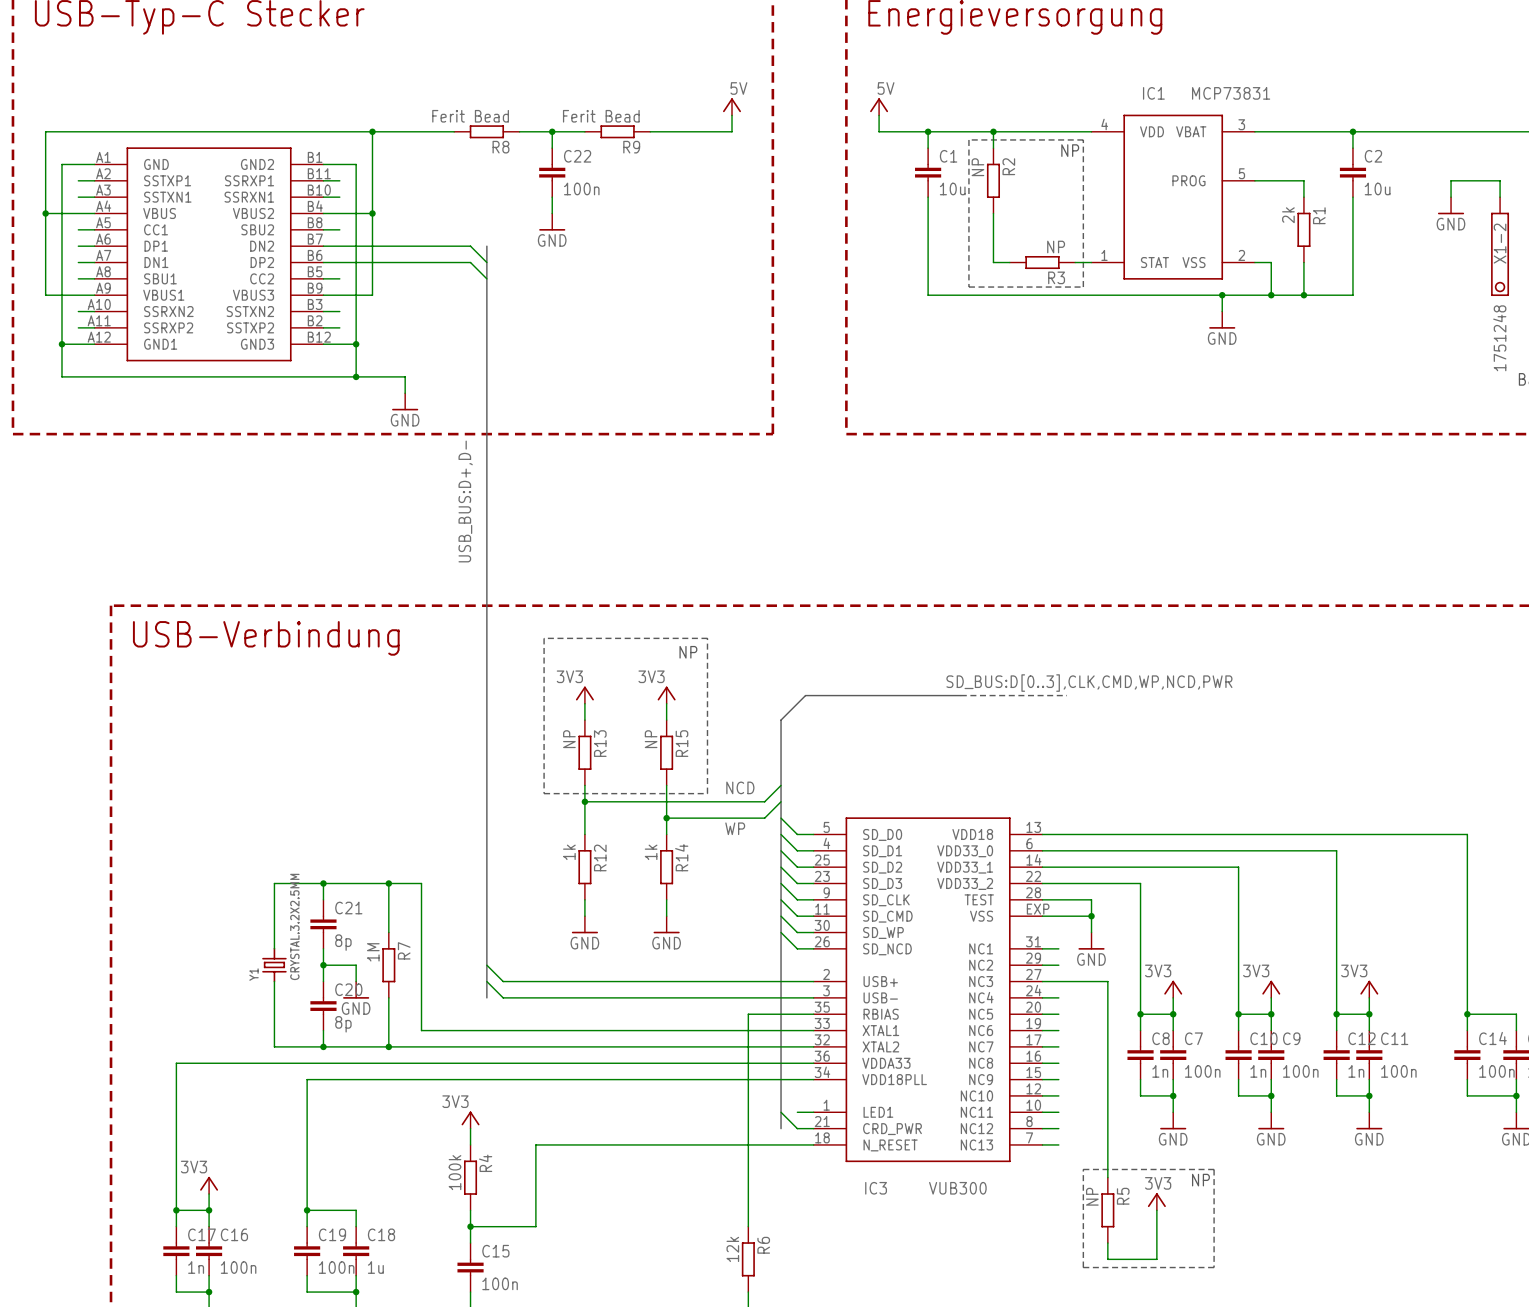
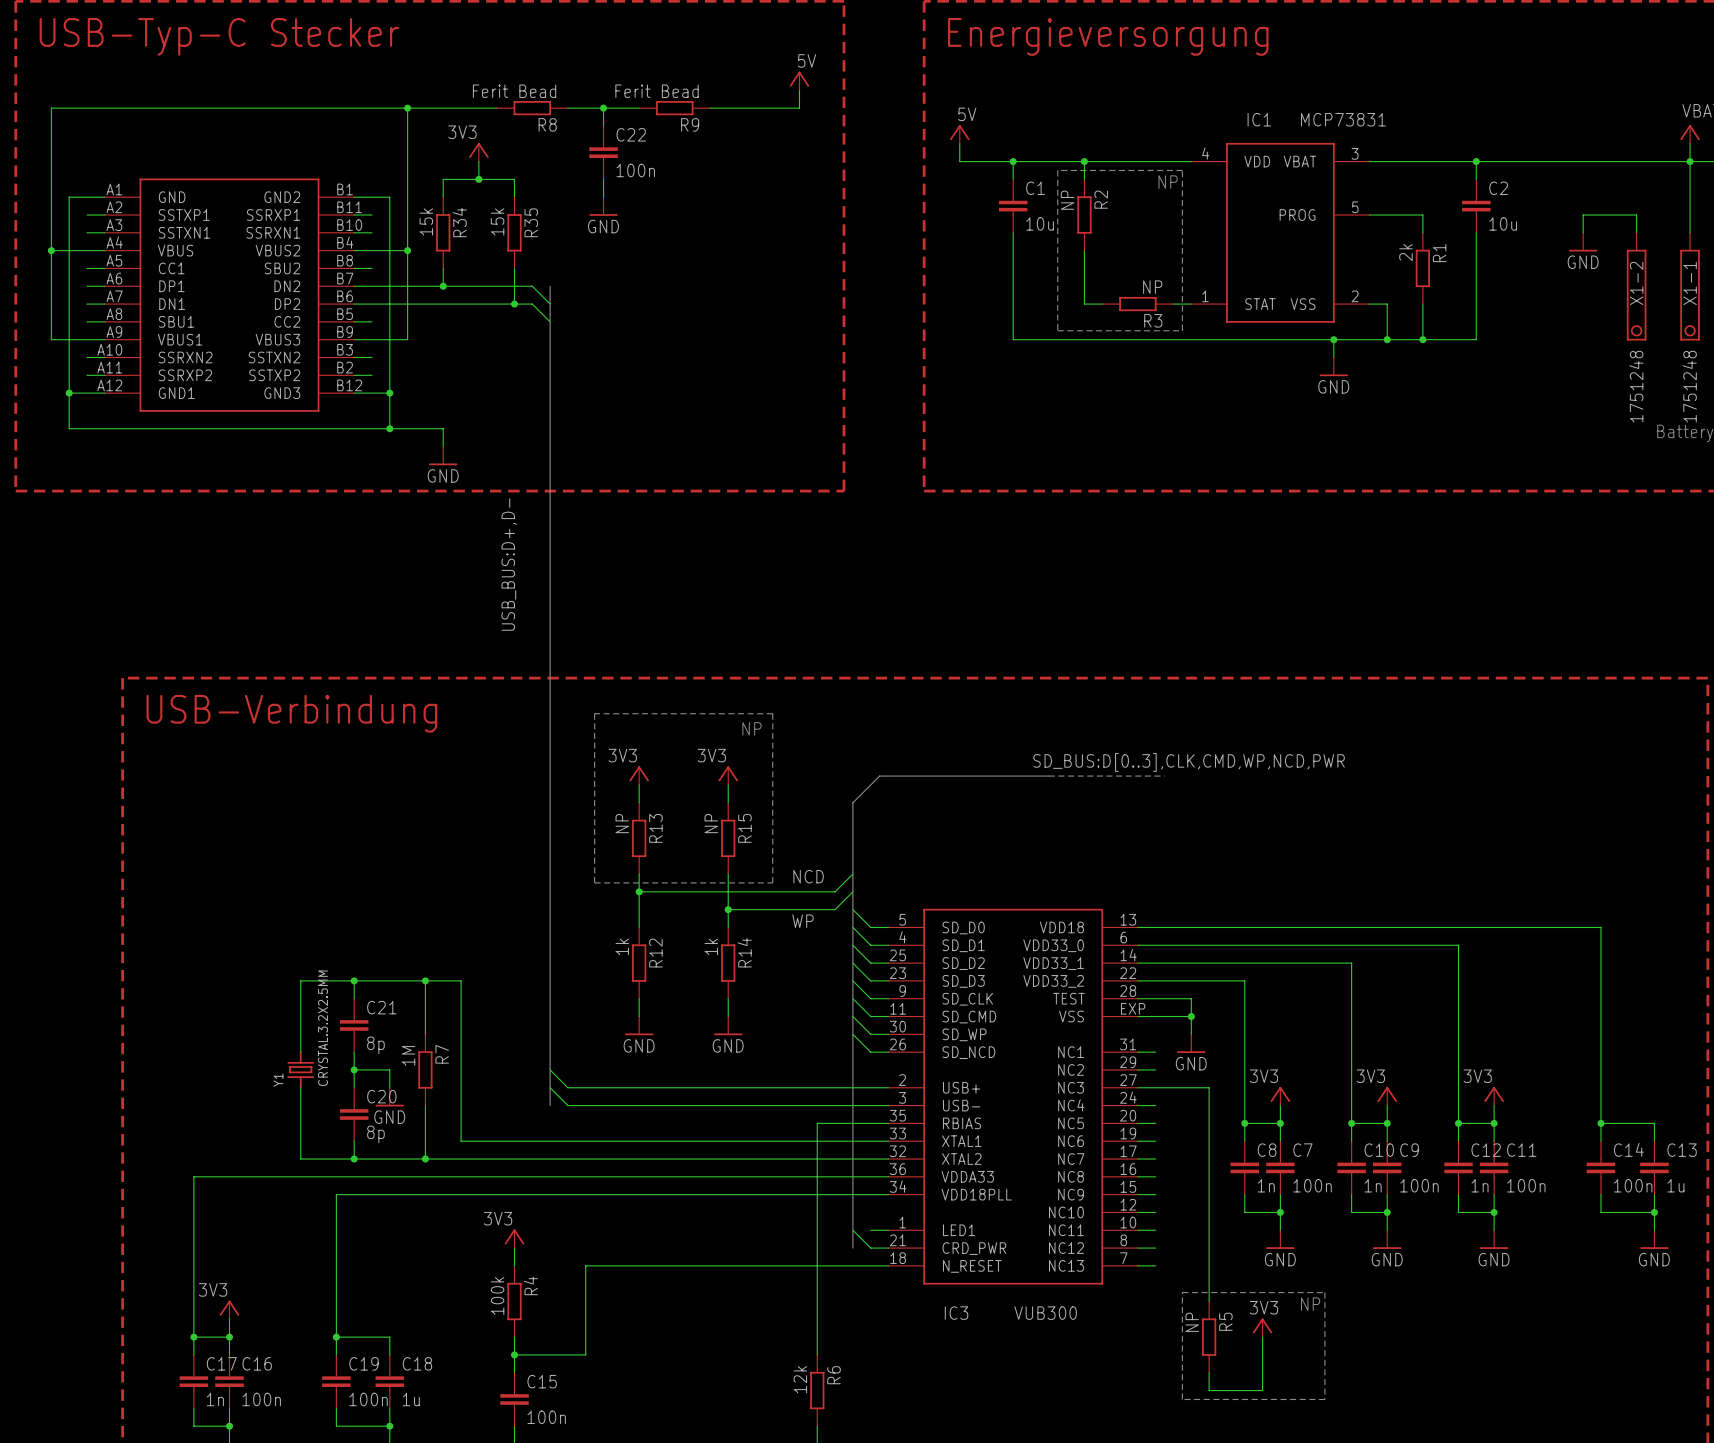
wire: none -> (407, 108) (407, 161)
junction: none -> (407, 108)
junction: none -> (603, 108)
power symbol position: 5V (732, 106) -> 5V (799, 80)
wire: (732, 115) (732, 131) (650, 131) -> (799, 90) (799, 108) (710, 108)
power symbol: none -> 3V3 (478, 152)
wire: (45, 131) (454, 131) -> (51, 161) (51, 108) (496, 108)
junction: (372, 131) -> none
wire: none -> (478, 161) (478, 179)
R8 position: (486, 131) -> (532, 108)
wire: (519, 131) (584, 131) -> (567, 108) (639, 108)
junction: (552, 131) -> none
R9 position: (617, 131) -> (674, 108)
junction: none -> (478, 179)
wire: none -> (443, 197) (443, 179) (514, 179) (514, 197)
C22 position: (552, 172) -> (603, 152)
R34: none -> 15k (443, 232)
R35: none -> 15k (514, 232)
wire: (552, 197) (552, 213) -> (603, 108) (603, 125)
power symbol position: GND (552, 222) -> GND (603, 206)
wire: none -> (443, 268) (443, 286)
wire: none -> (514, 268) (514, 304) (532, 304) (550, 321)
junction: none -> (443, 286)
wire: (470, 246) (486, 262) -> (514, 286) (532, 286) (550, 304)
bus: (486, 246) (486, 997) -> (550, 286) (550, 1105)
wire: (470, 262) (486, 278) -> none
junction: none -> (514, 304)
wire: (486, 965) (503, 981) (519, 981) -> (550, 1069) (567, 1087)
wire: (486, 981) (503, 997) (519, 997) -> (550, 1087) (567, 1105)

